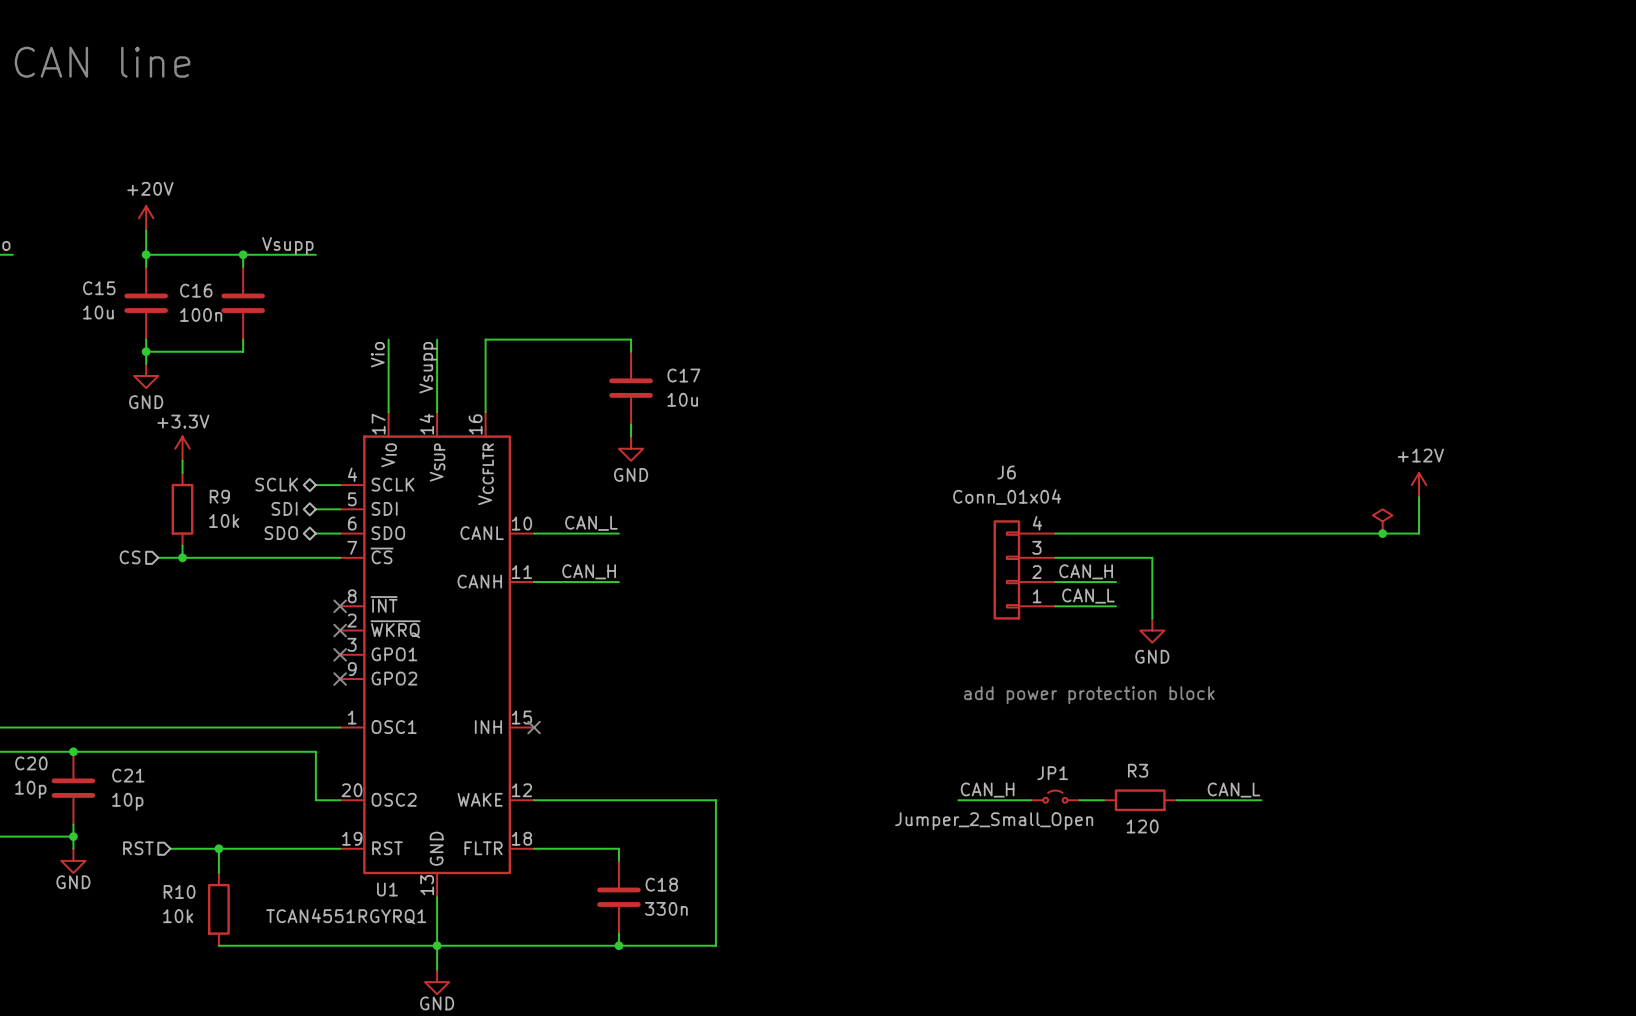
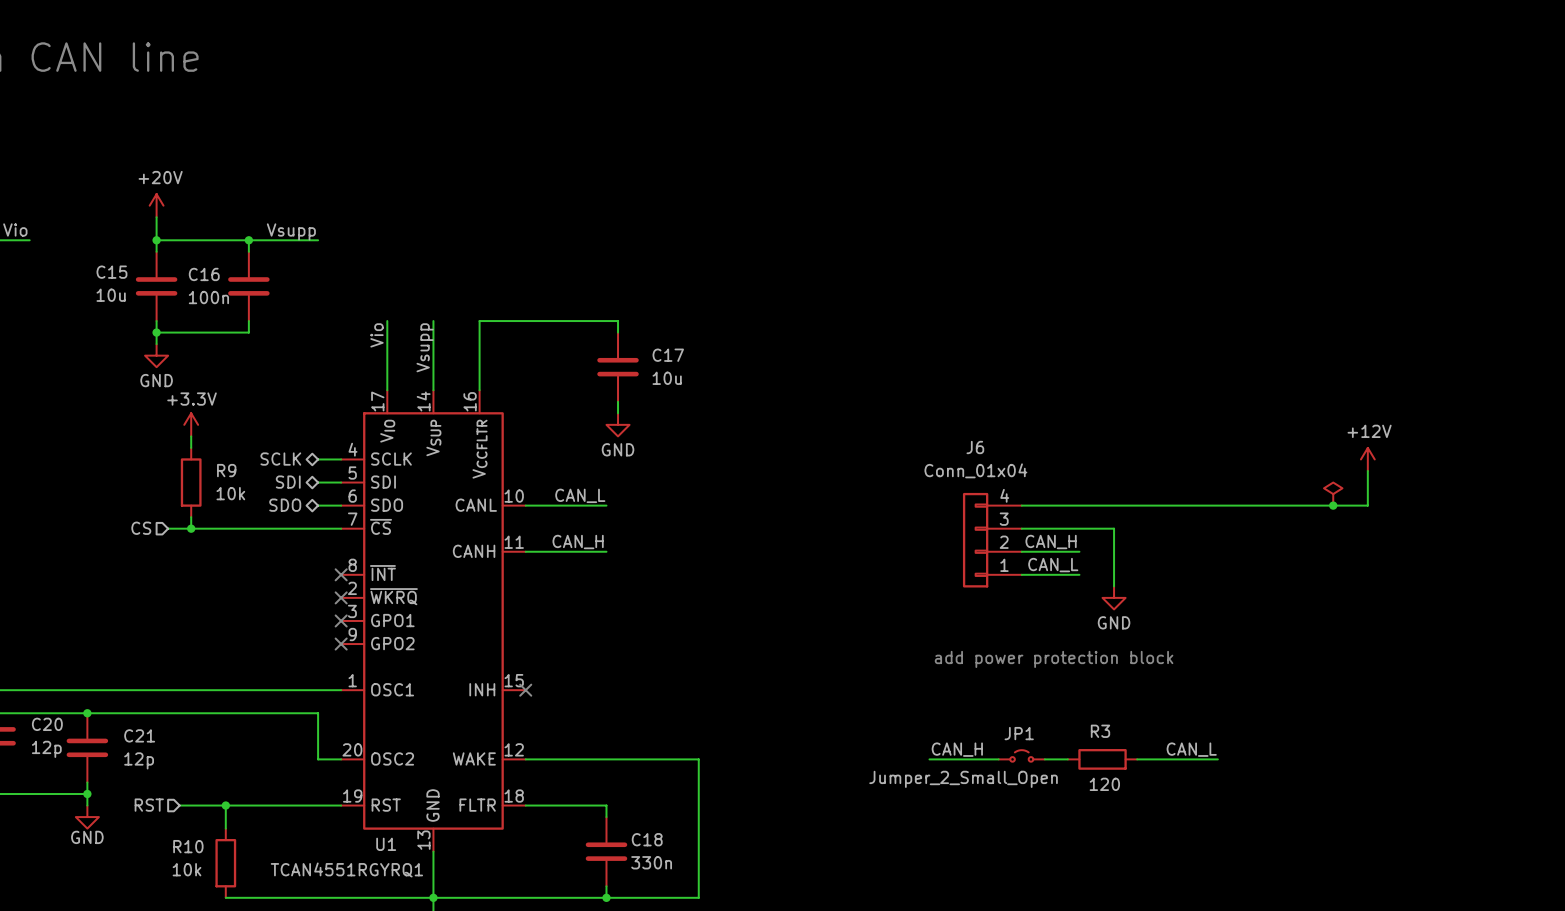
C20 value: 10p (30, 789) -> 12p (46, 749)
C21 value: 10p (127, 801) -> 12p (139, 760)

